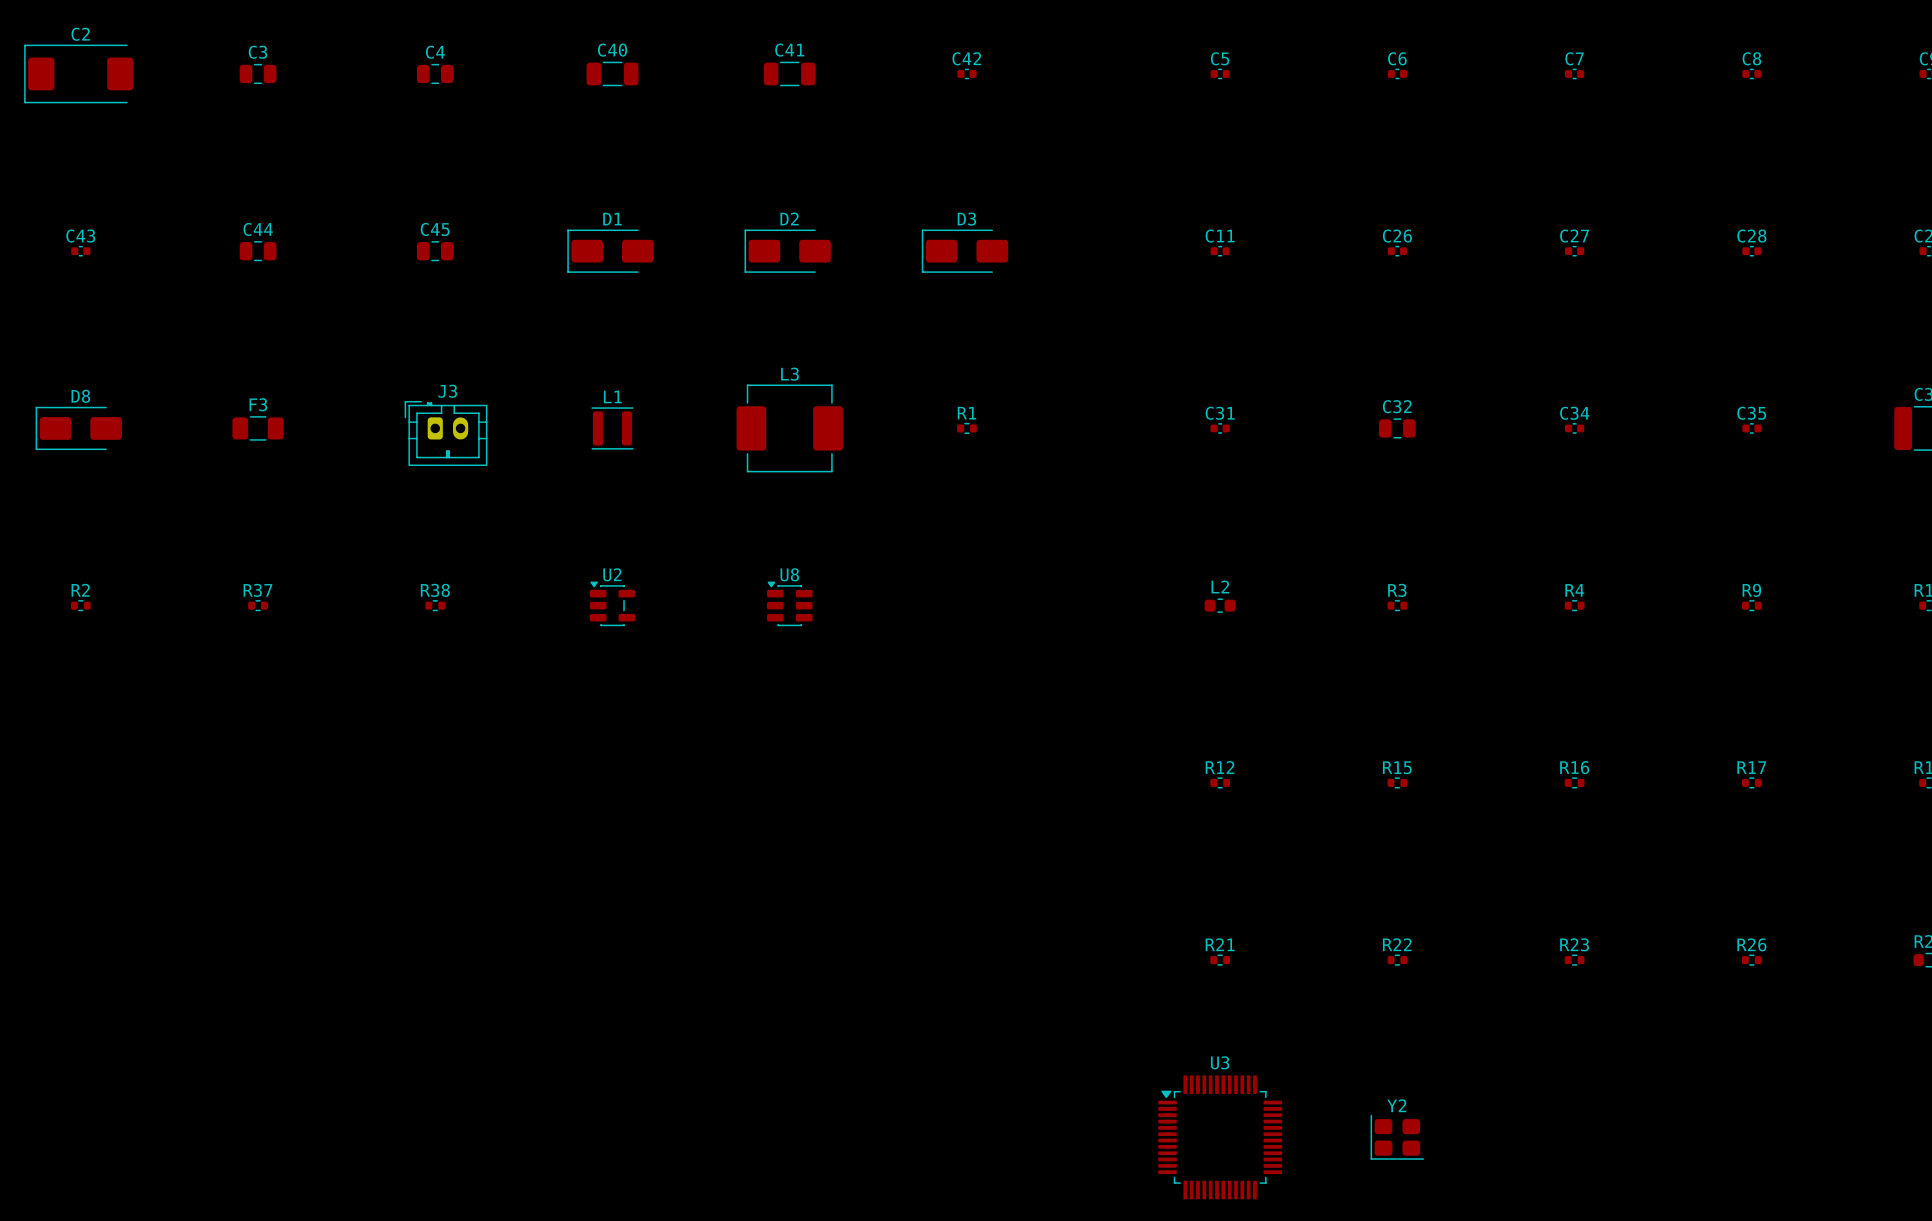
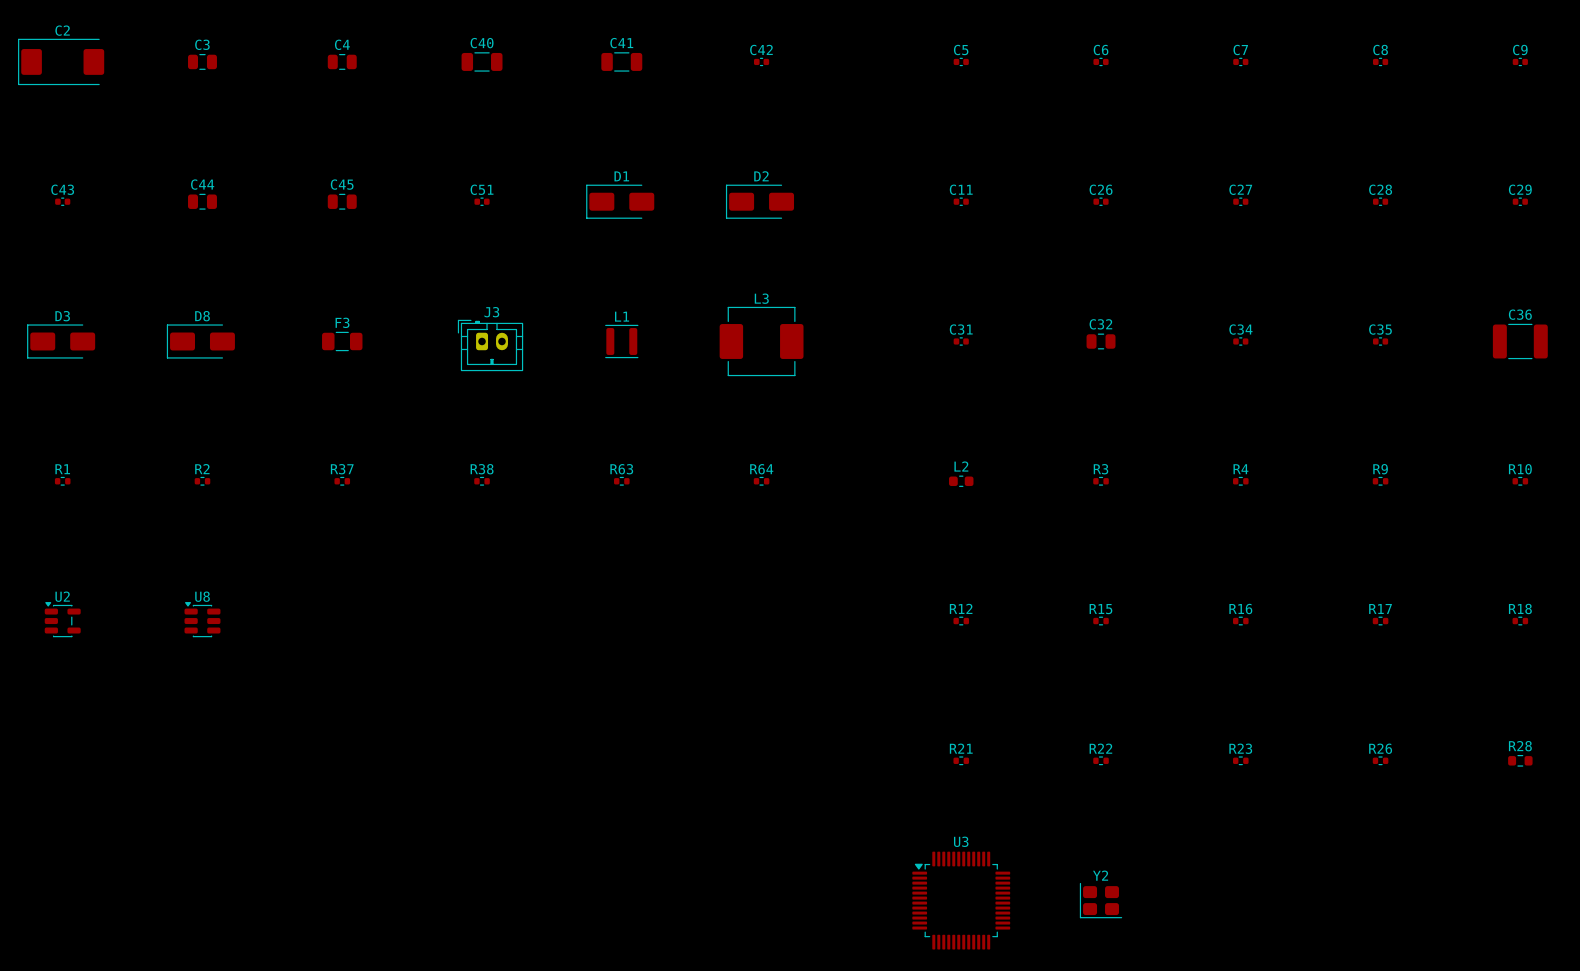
D2 name: D2 (789, 218) -> D1 (621, 176)
D3 name: D3 (966, 219) -> D2 (761, 176)
D1: (610, 251) -> none
C51: none -> (482, 201)
D8 name: D8 (80, 396) -> D3 (62, 316)
D8: none -> (200, 341)
F3 position: (258, 428) -> (342, 341)
L1 position: (612, 428) -> (621, 341)
L3 position: (789, 428) -> (761, 341)
R1: (966, 428) -> none
J3 position: (446, 433) -> (490, 345)
R2 name: R2 (80, 590) -> R1 (62, 469)
R37 name: R37 (257, 590) -> R2 (202, 469)
R38 name: R38 (435, 590) -> R37 (342, 469)
U2 position: (612, 603) -> (62, 619)
U8 position: (789, 603) -> (202, 619)
R38: none -> (482, 481)
R63: none -> (621, 481)
R64: none -> (761, 481)

